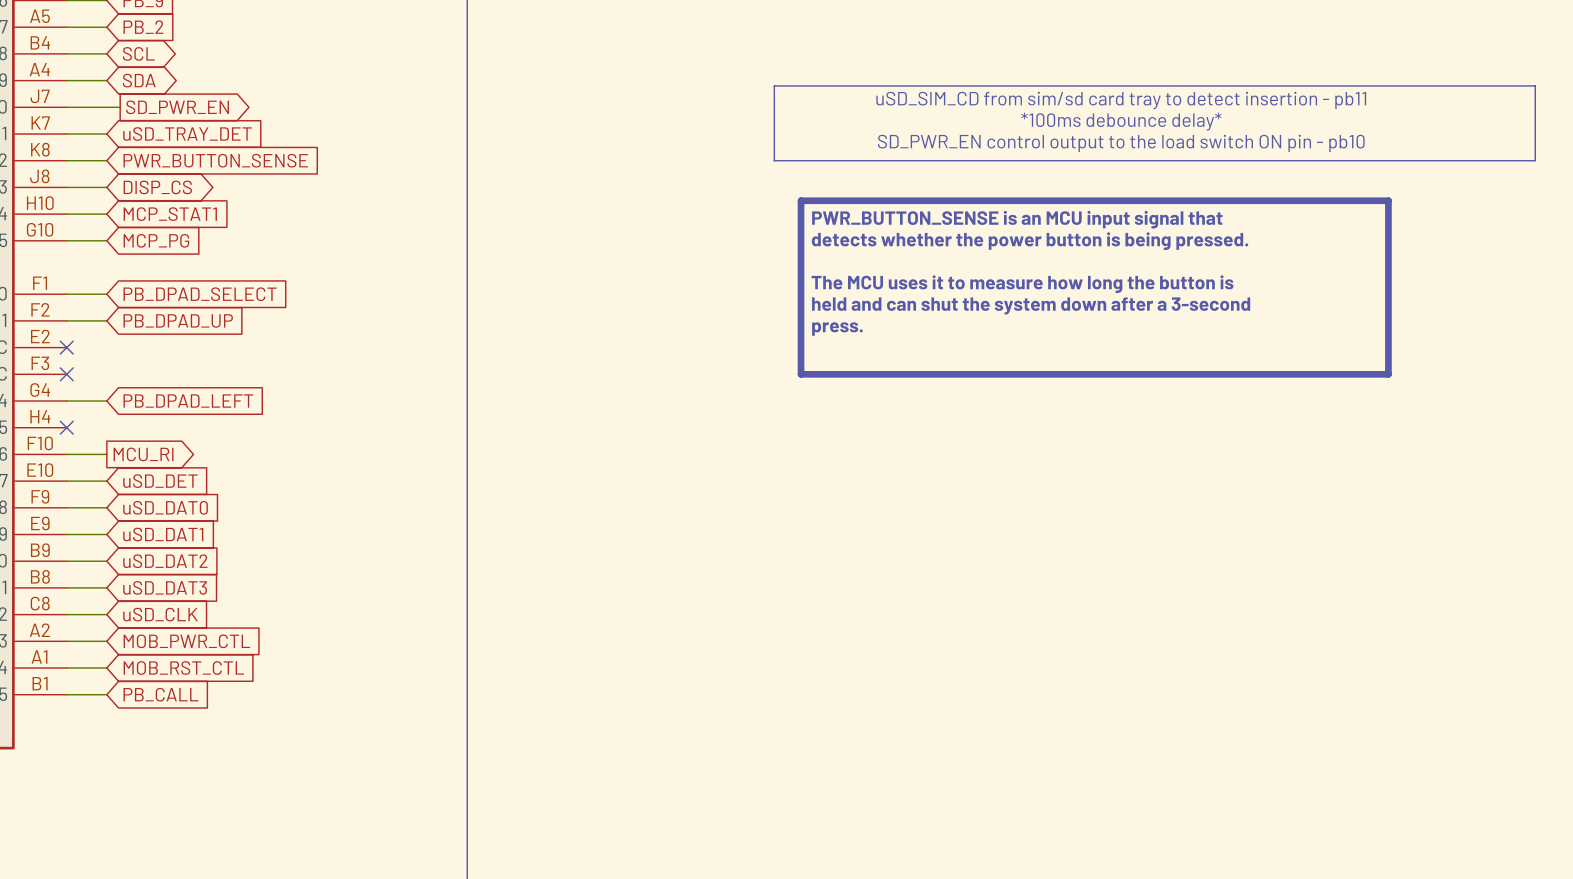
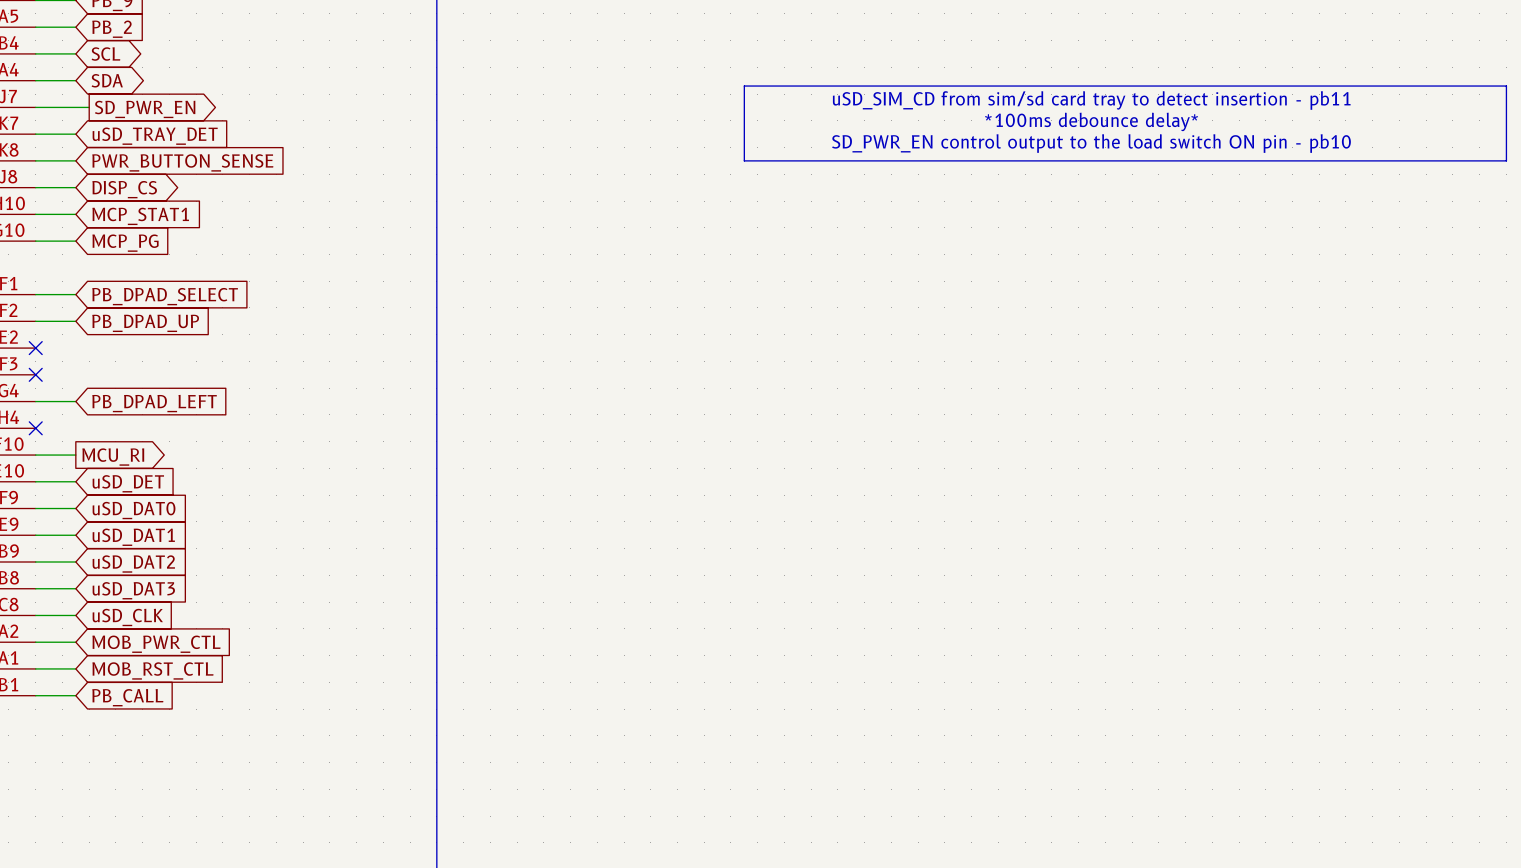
line: (801, 200) (1388, 200) (1388, 374) (801, 374) (801, 200) -> none
text: PWR_BUTTON_SENSE is an MCU input signal that (1017, 219) -> none
text: detects whether the power button is being pressed. (1030, 241) -> none
text: The MCU uses it to measure how long the button is (1022, 284) -> none
text: held and can shut the system down after a 3-second (1031, 305) -> none
text: press. (837, 329) -> none

